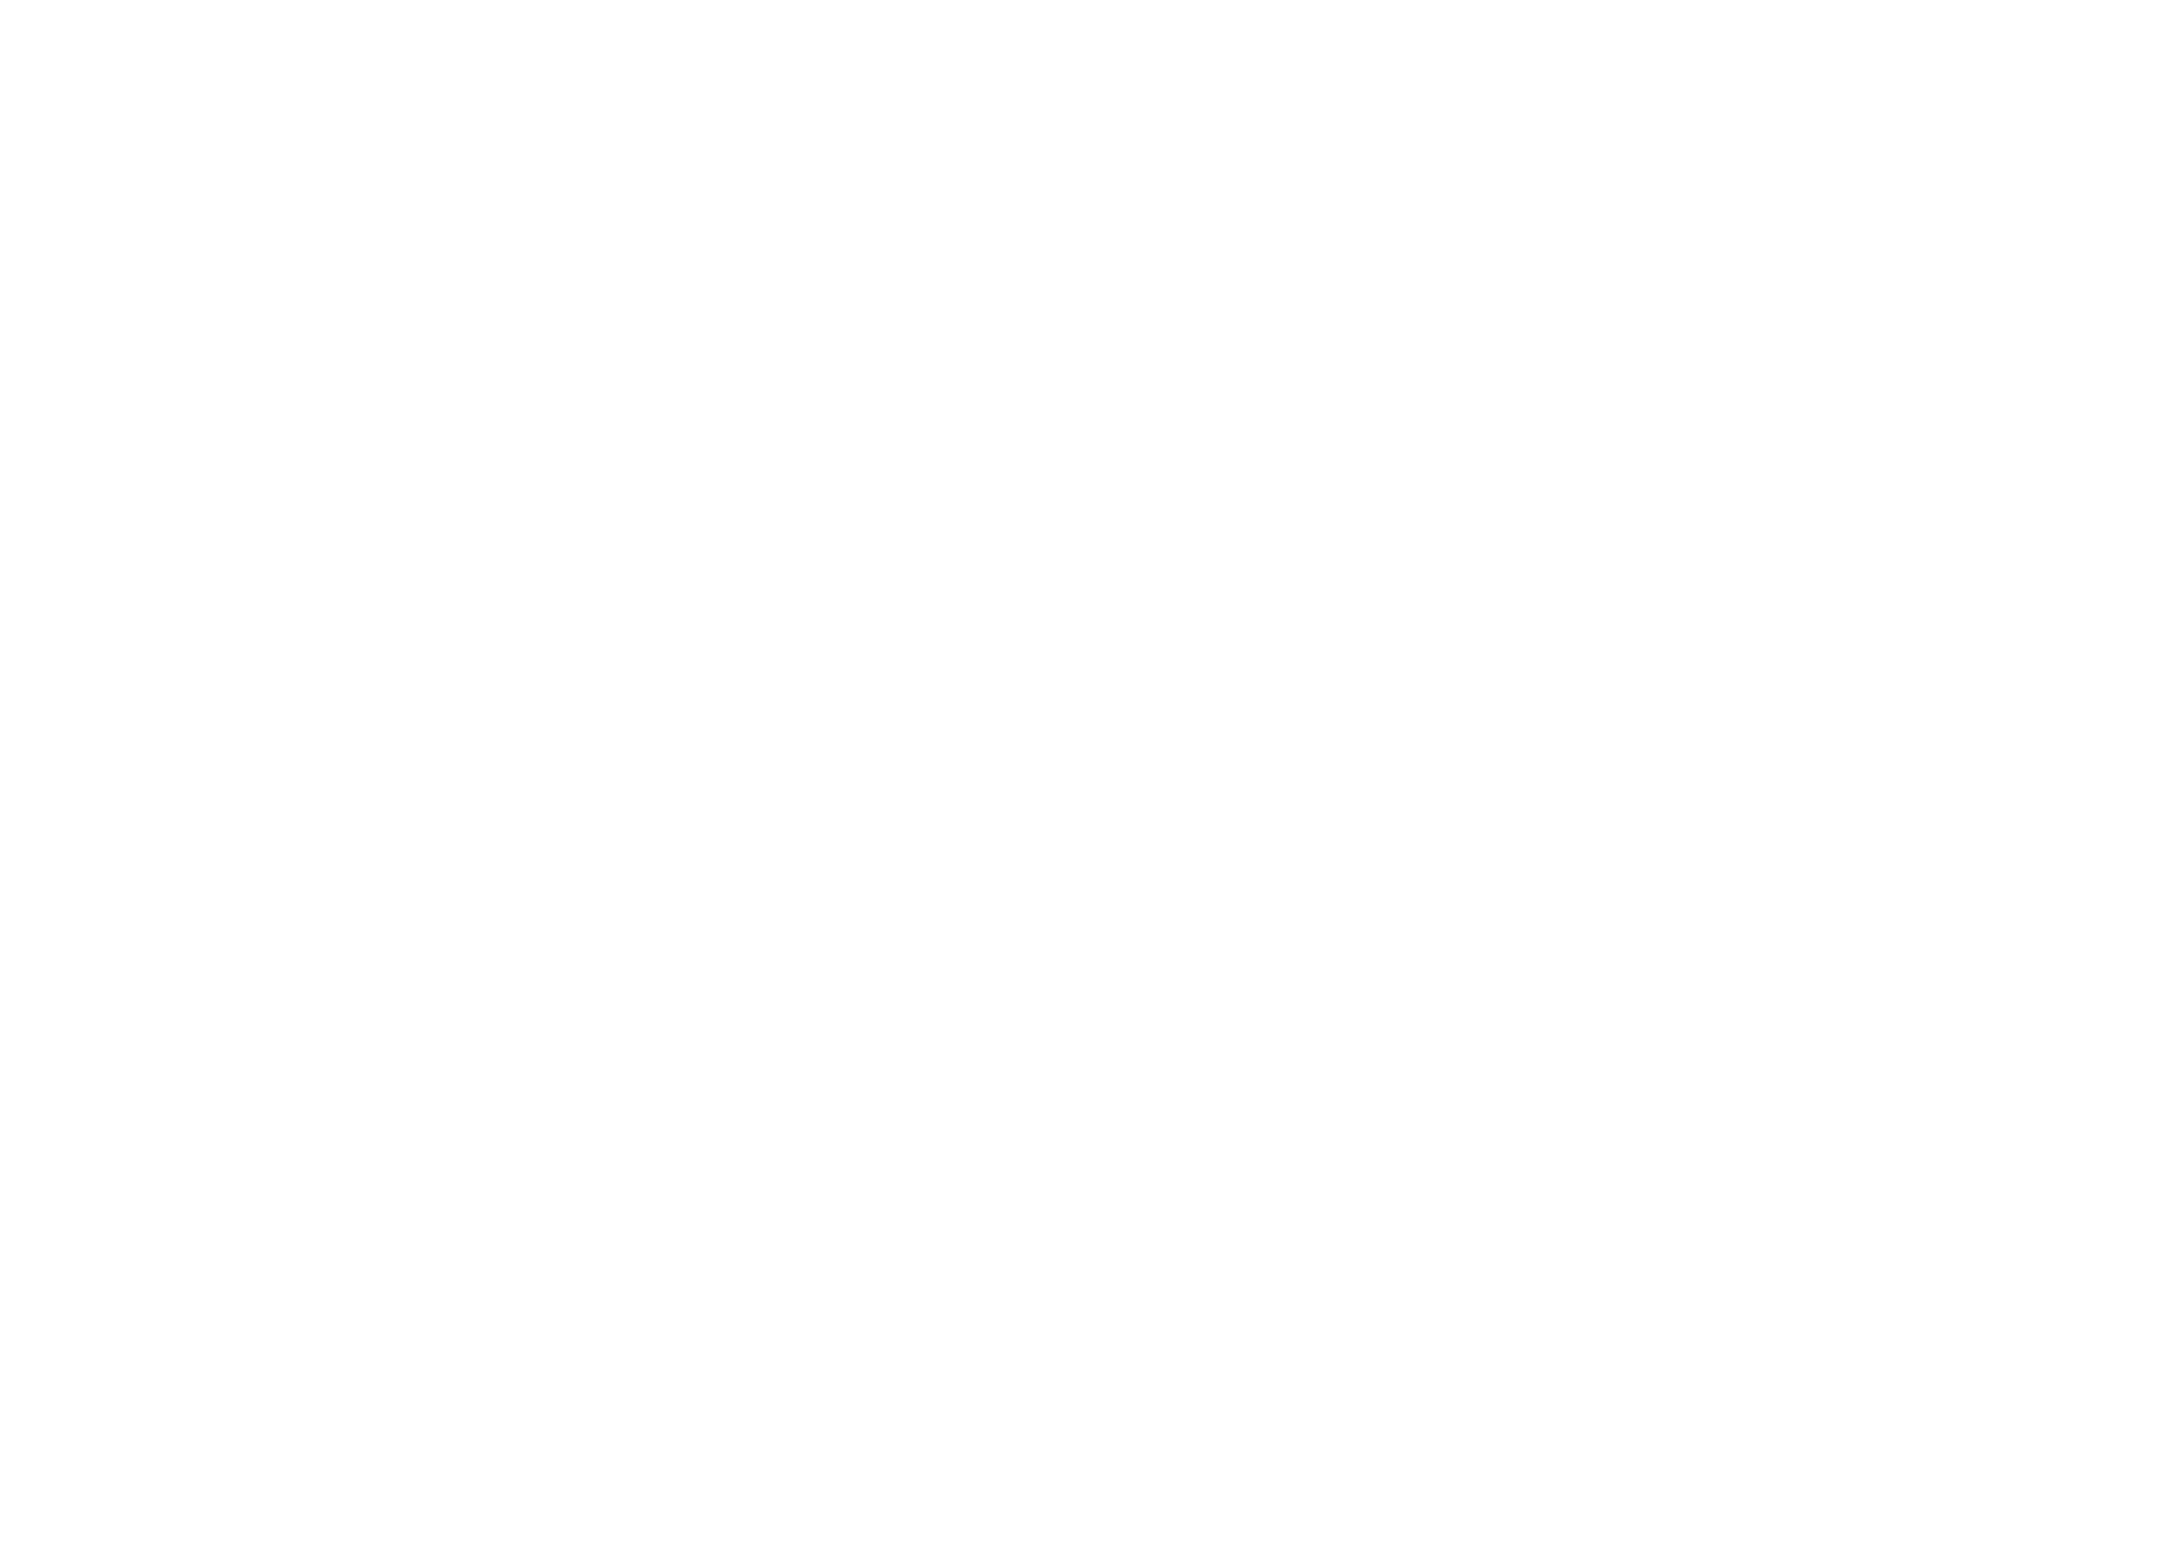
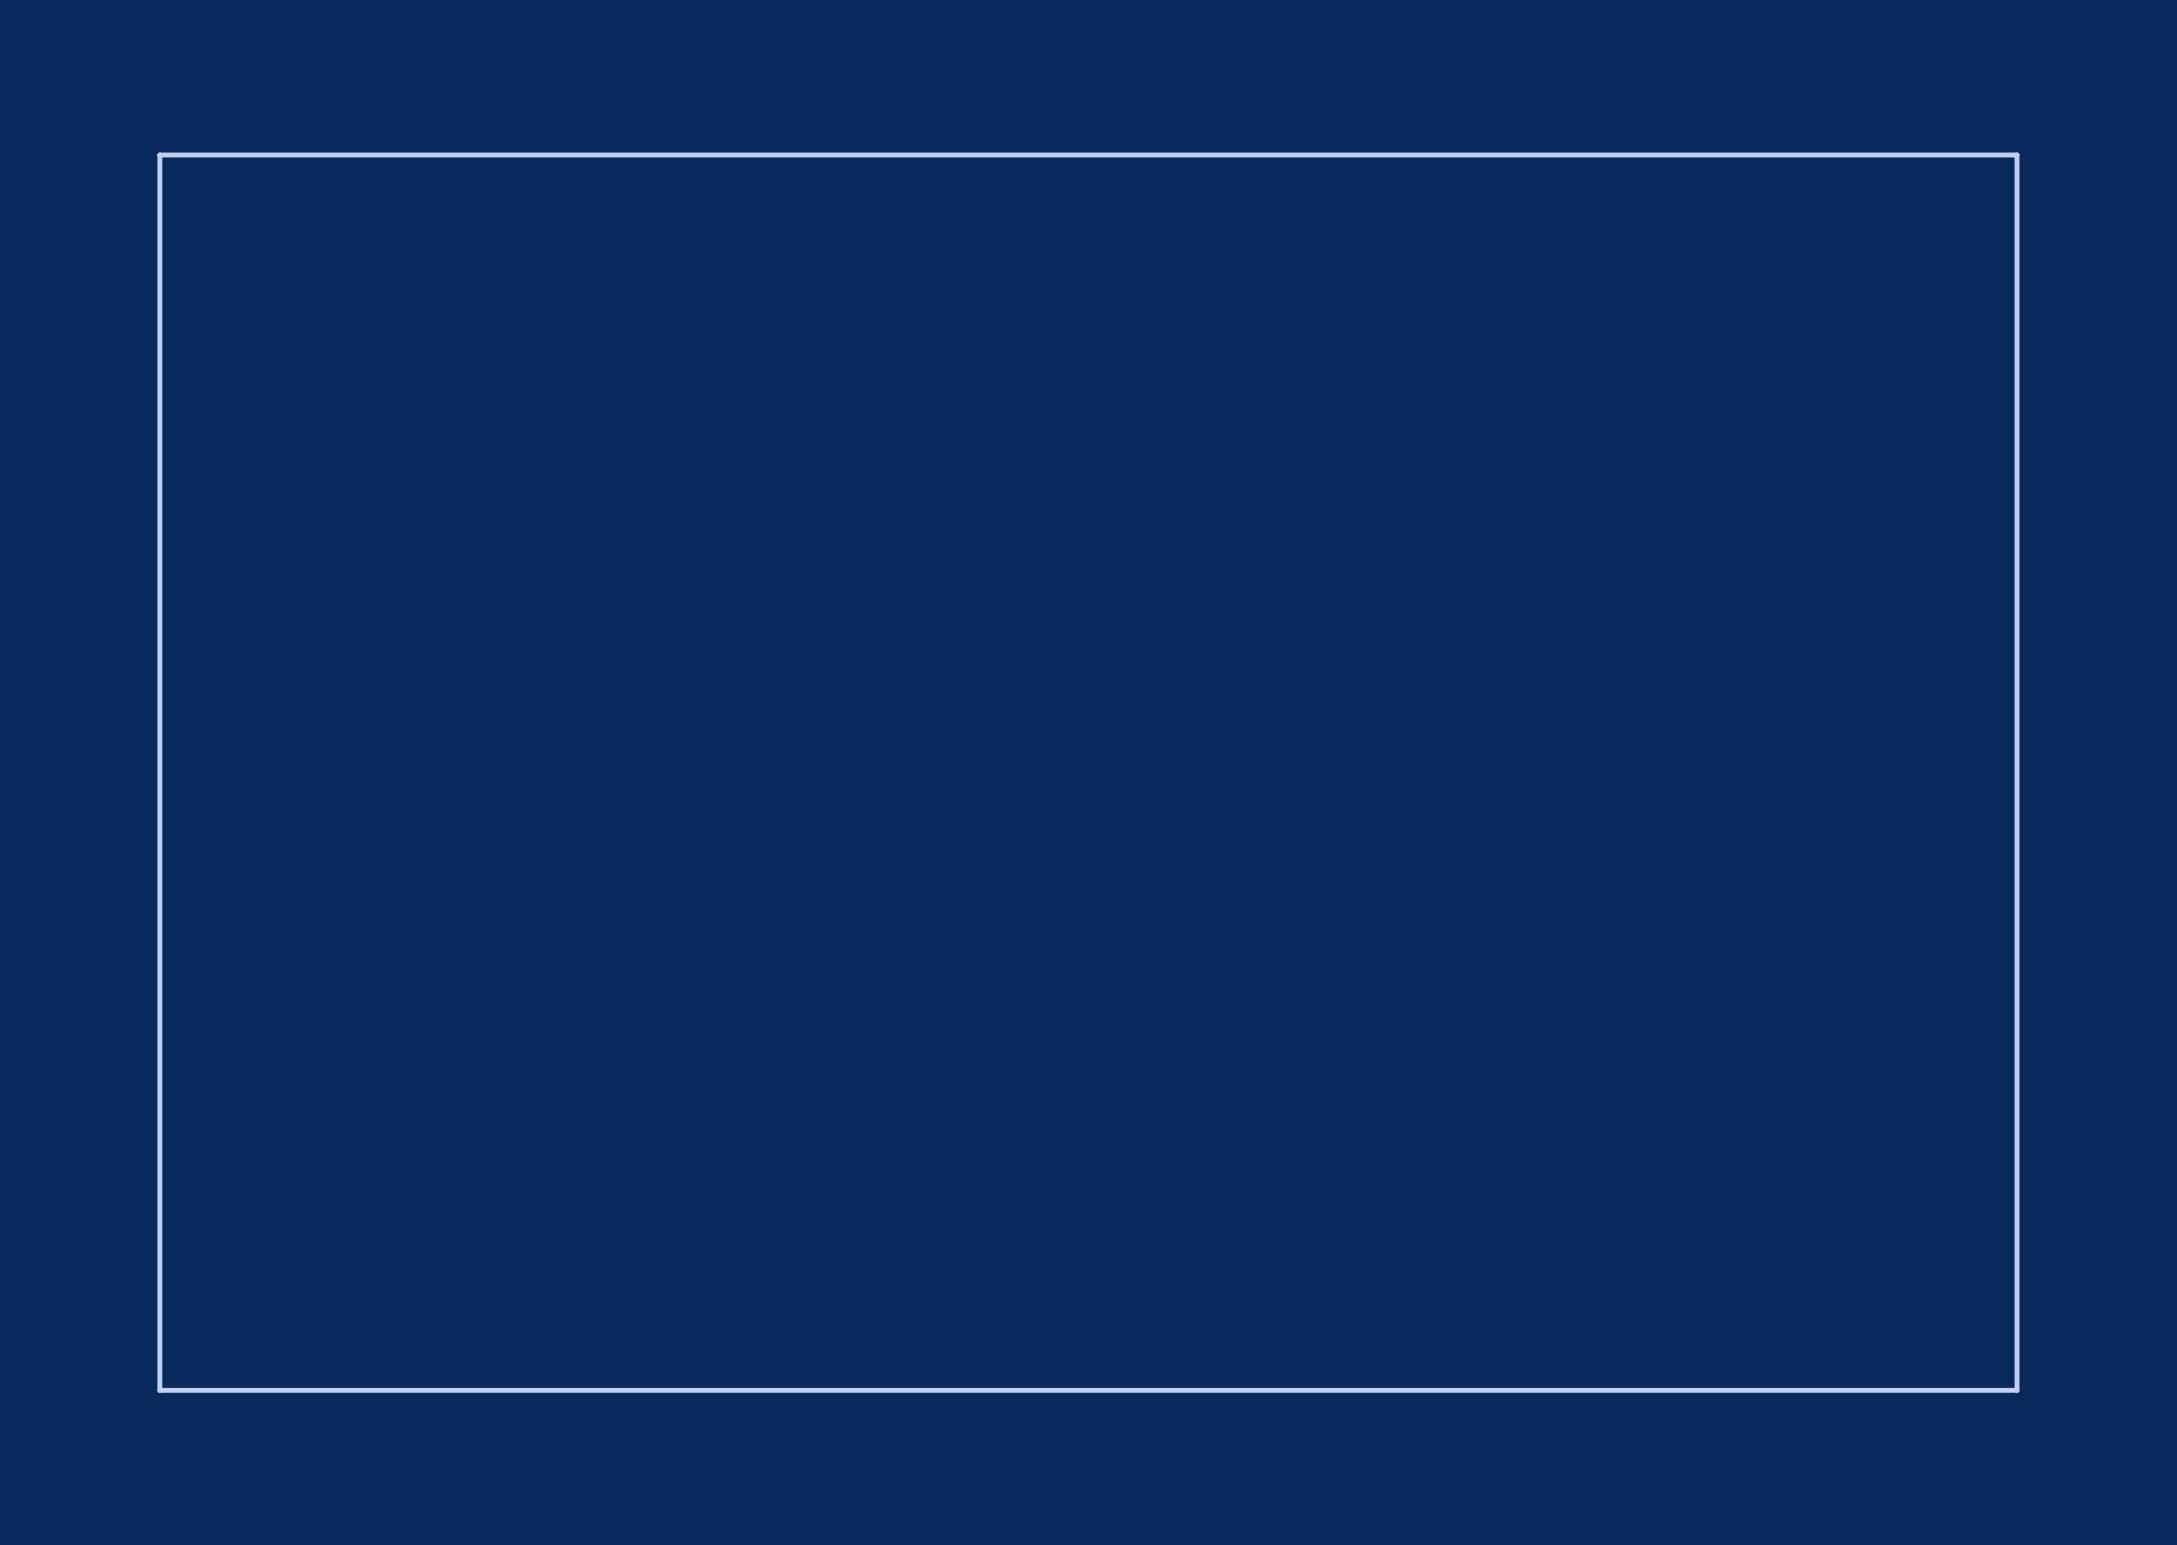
board edge: none -> (2017, 154) (159, 154) (159, 1390) (2017, 1390) (2017, 154)

